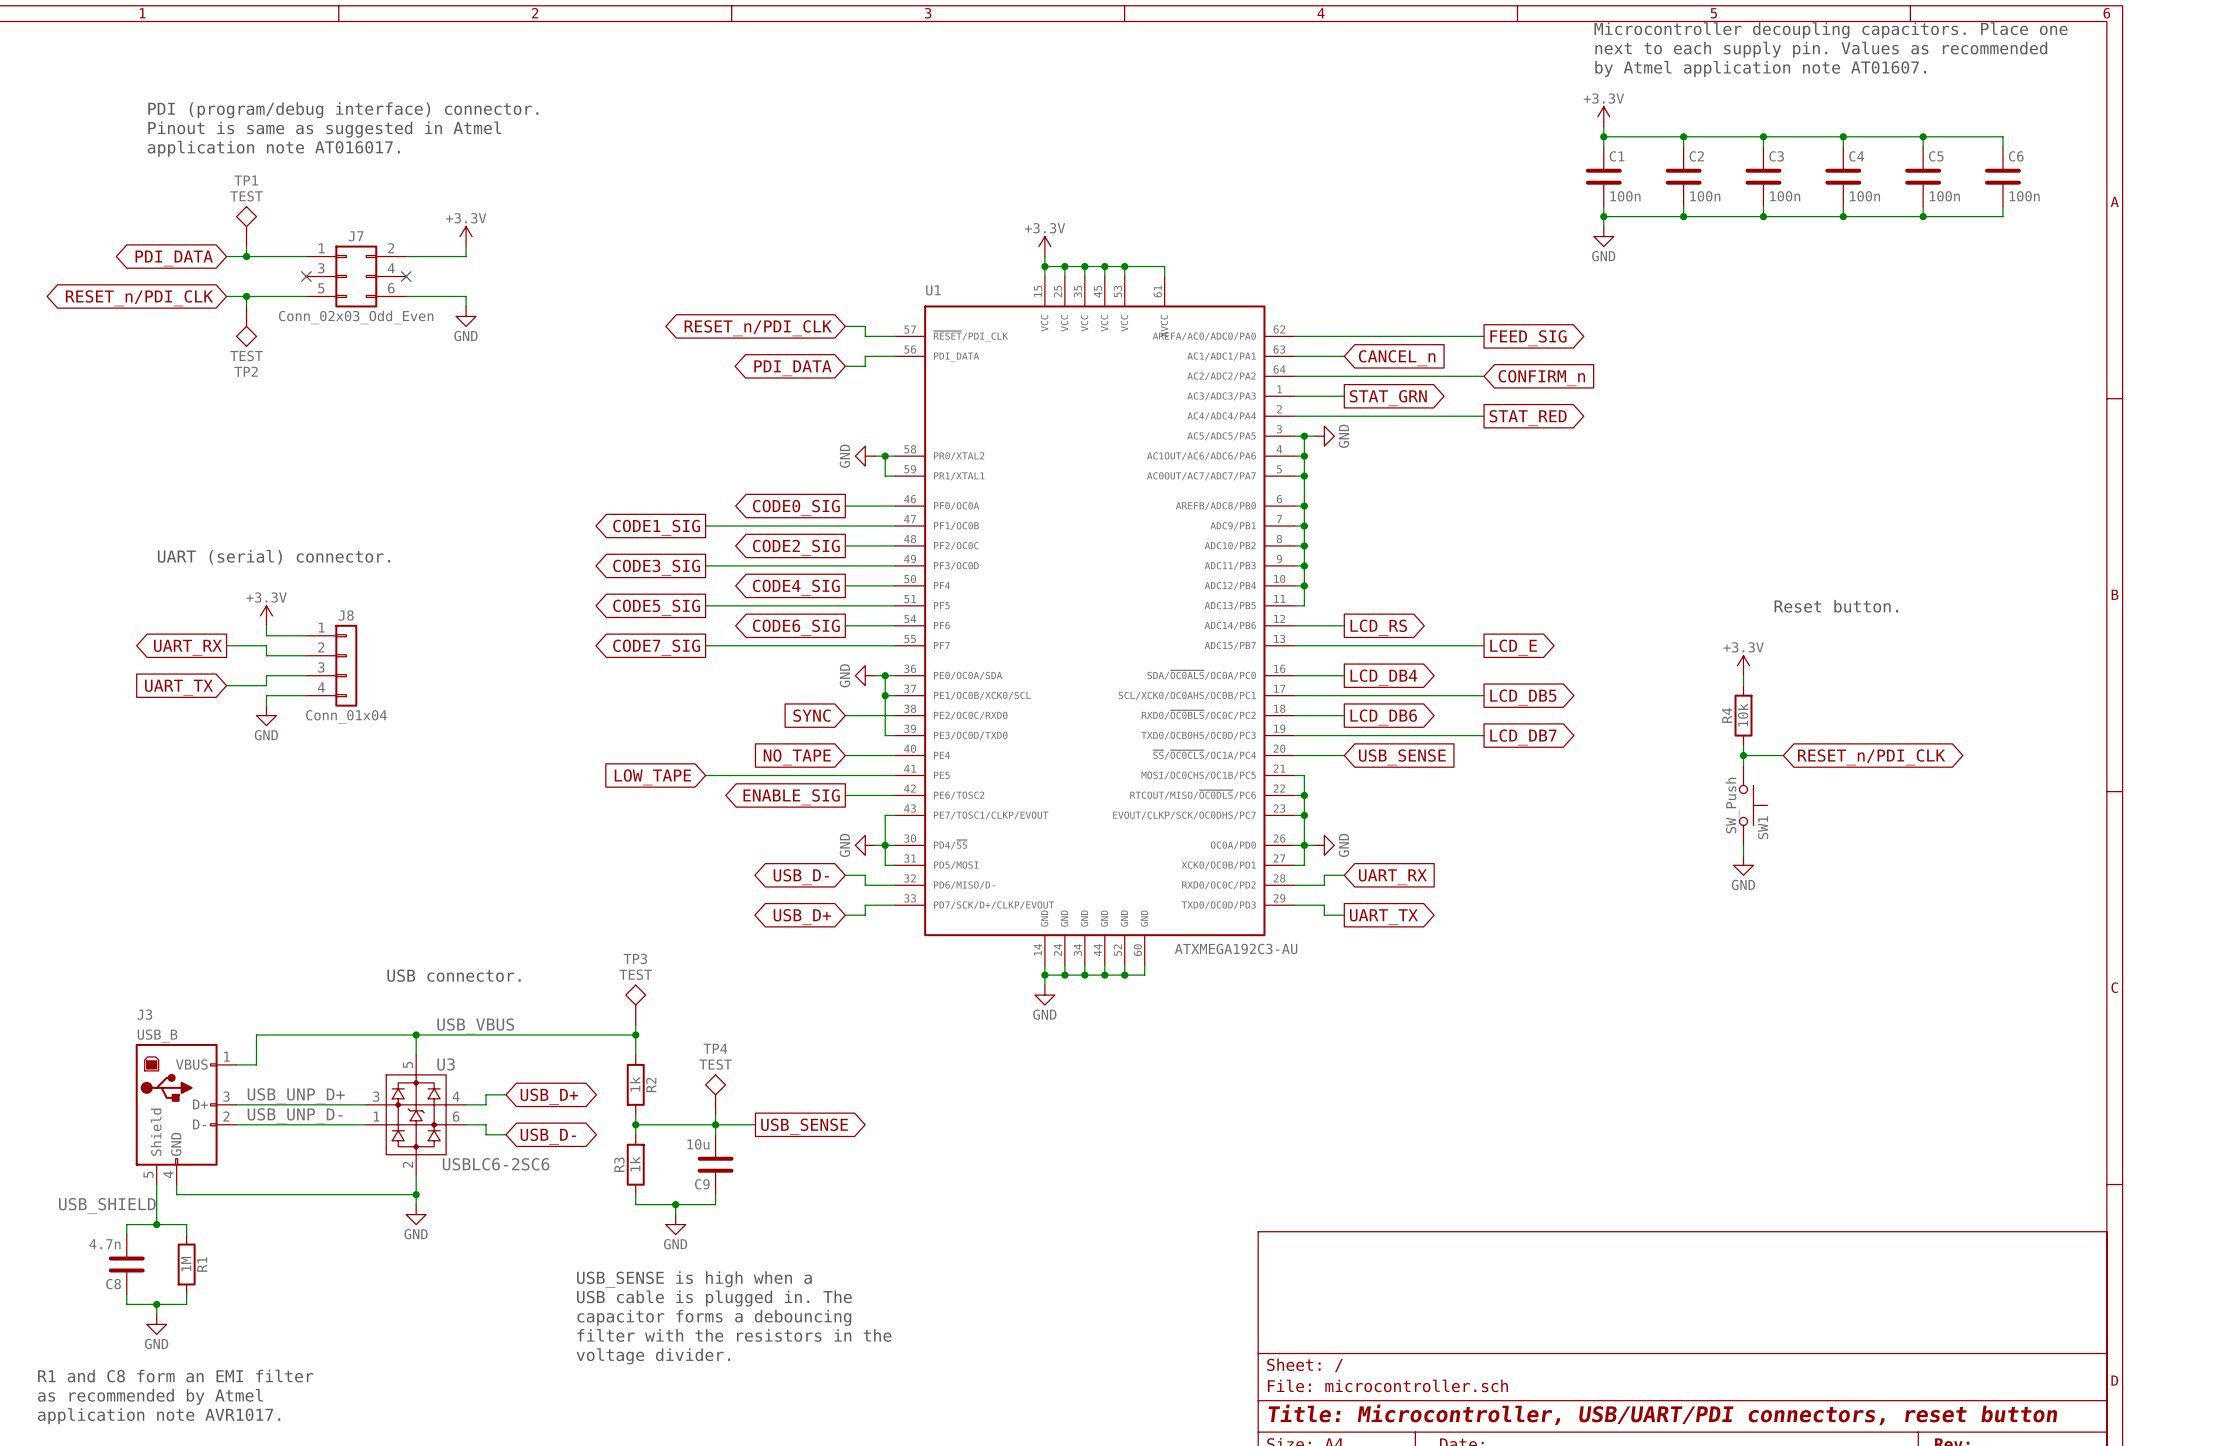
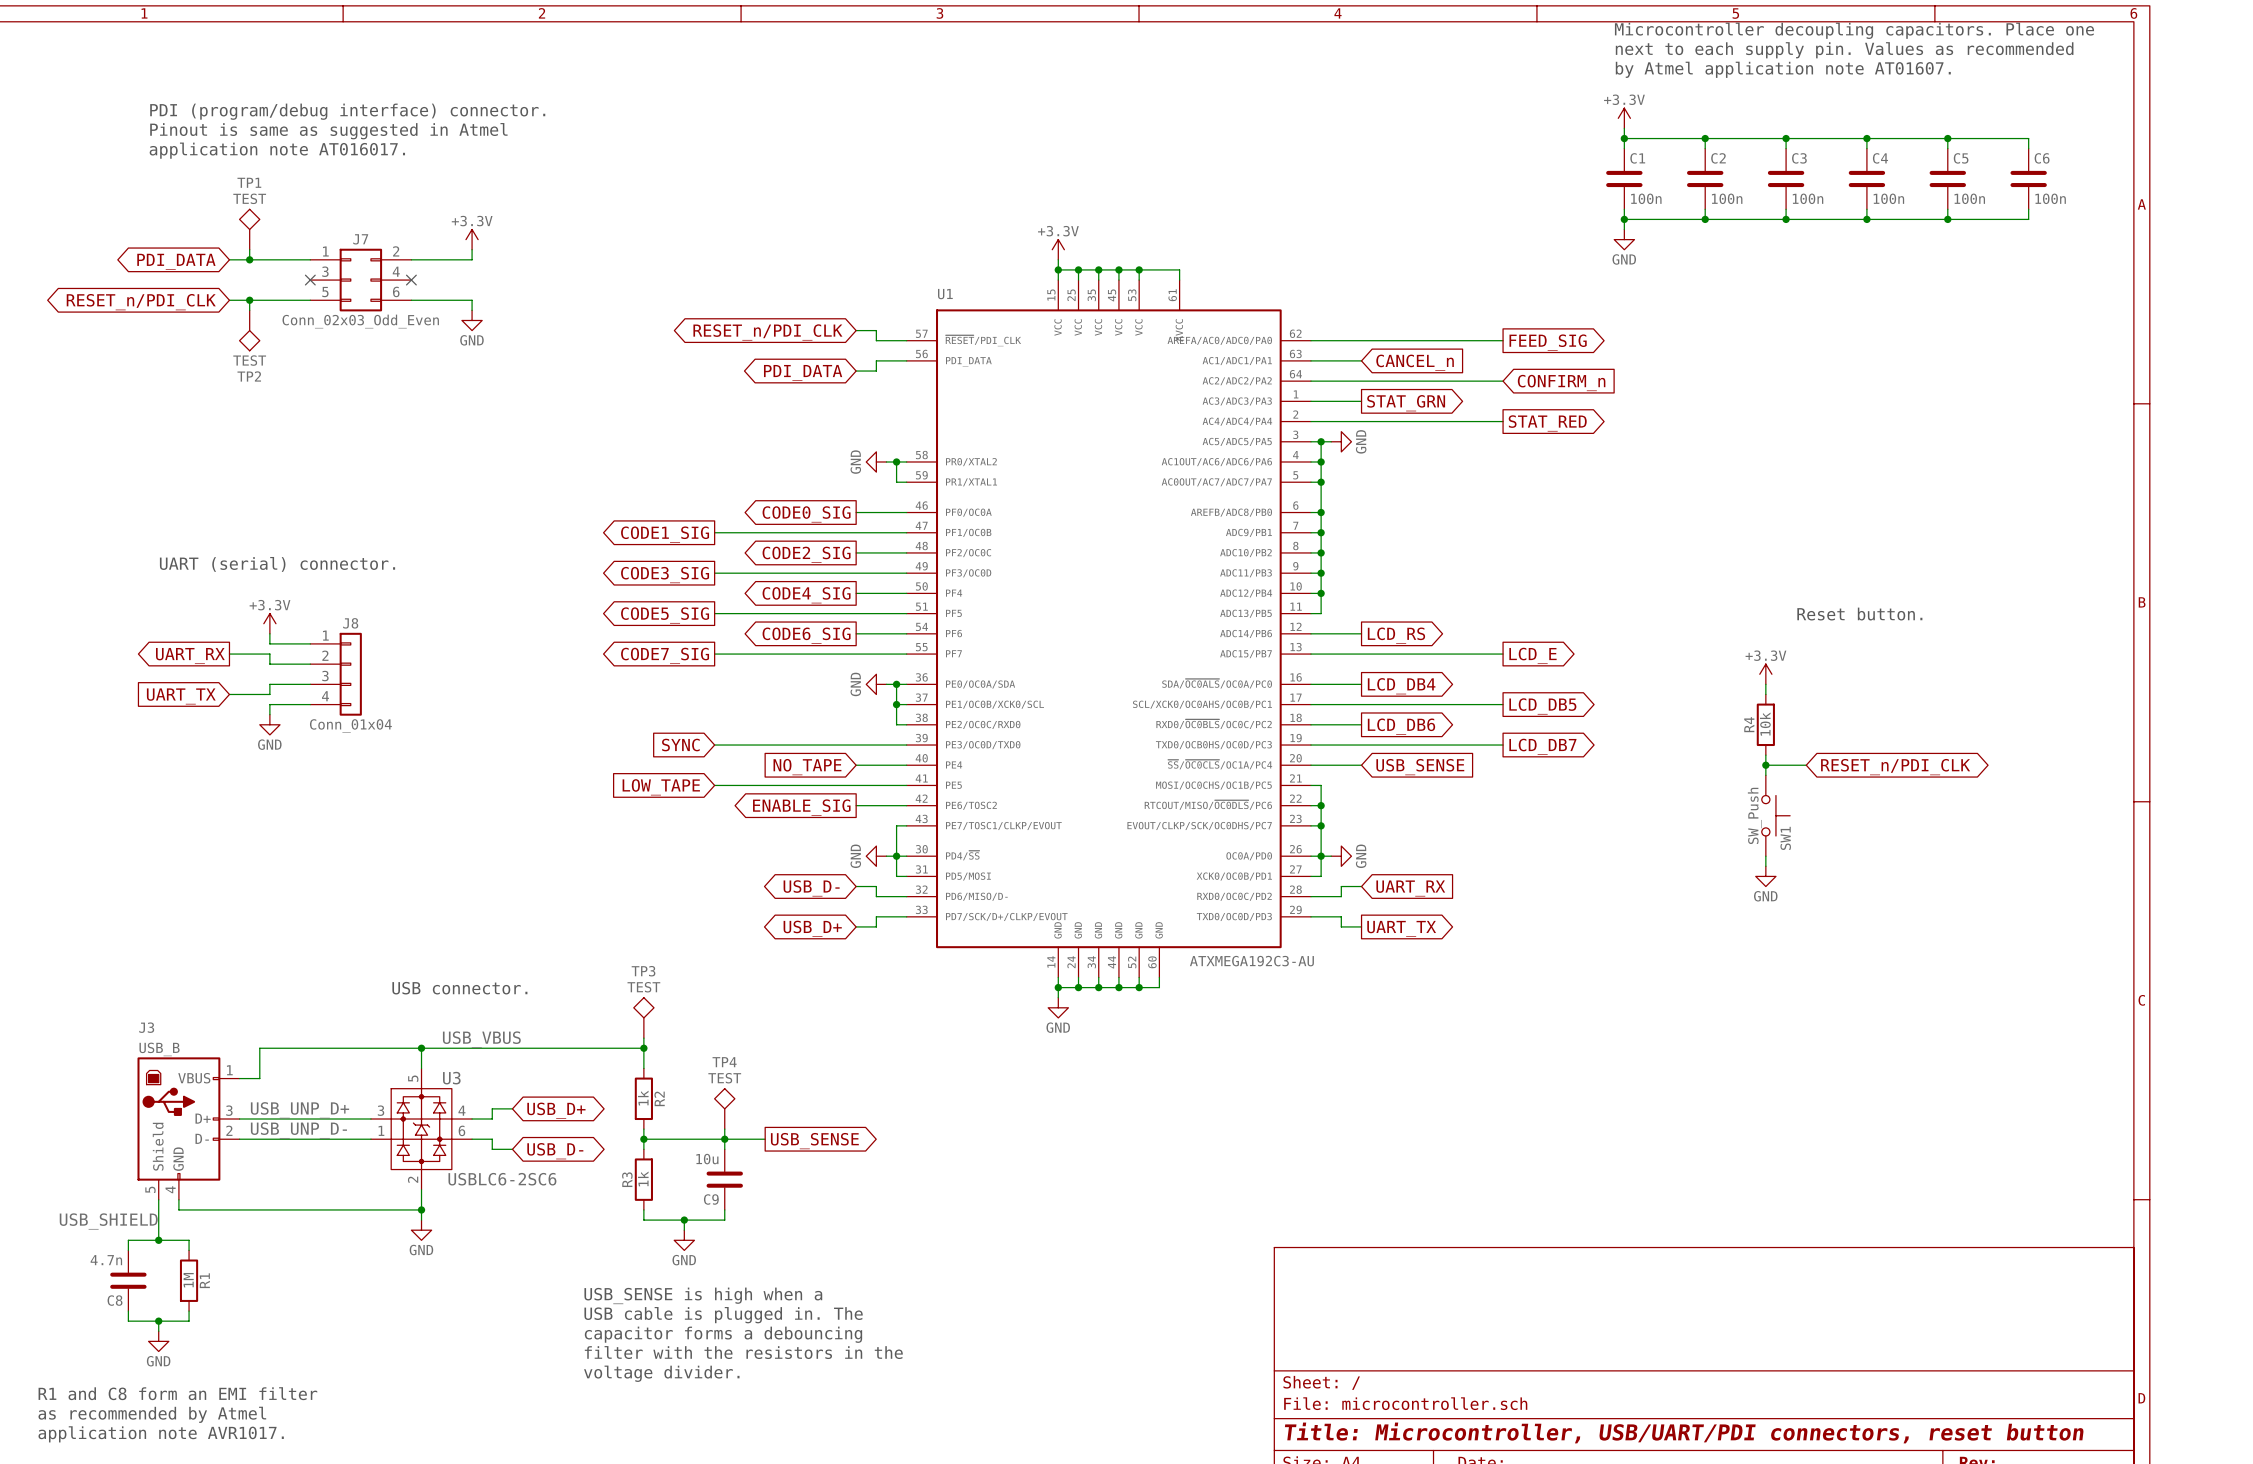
global label position: SYNC (811, 715) -> SYNC (680, 745)
wire: (845, 715) (885, 715) (885, 735) -> (714, 745) (896, 745)

